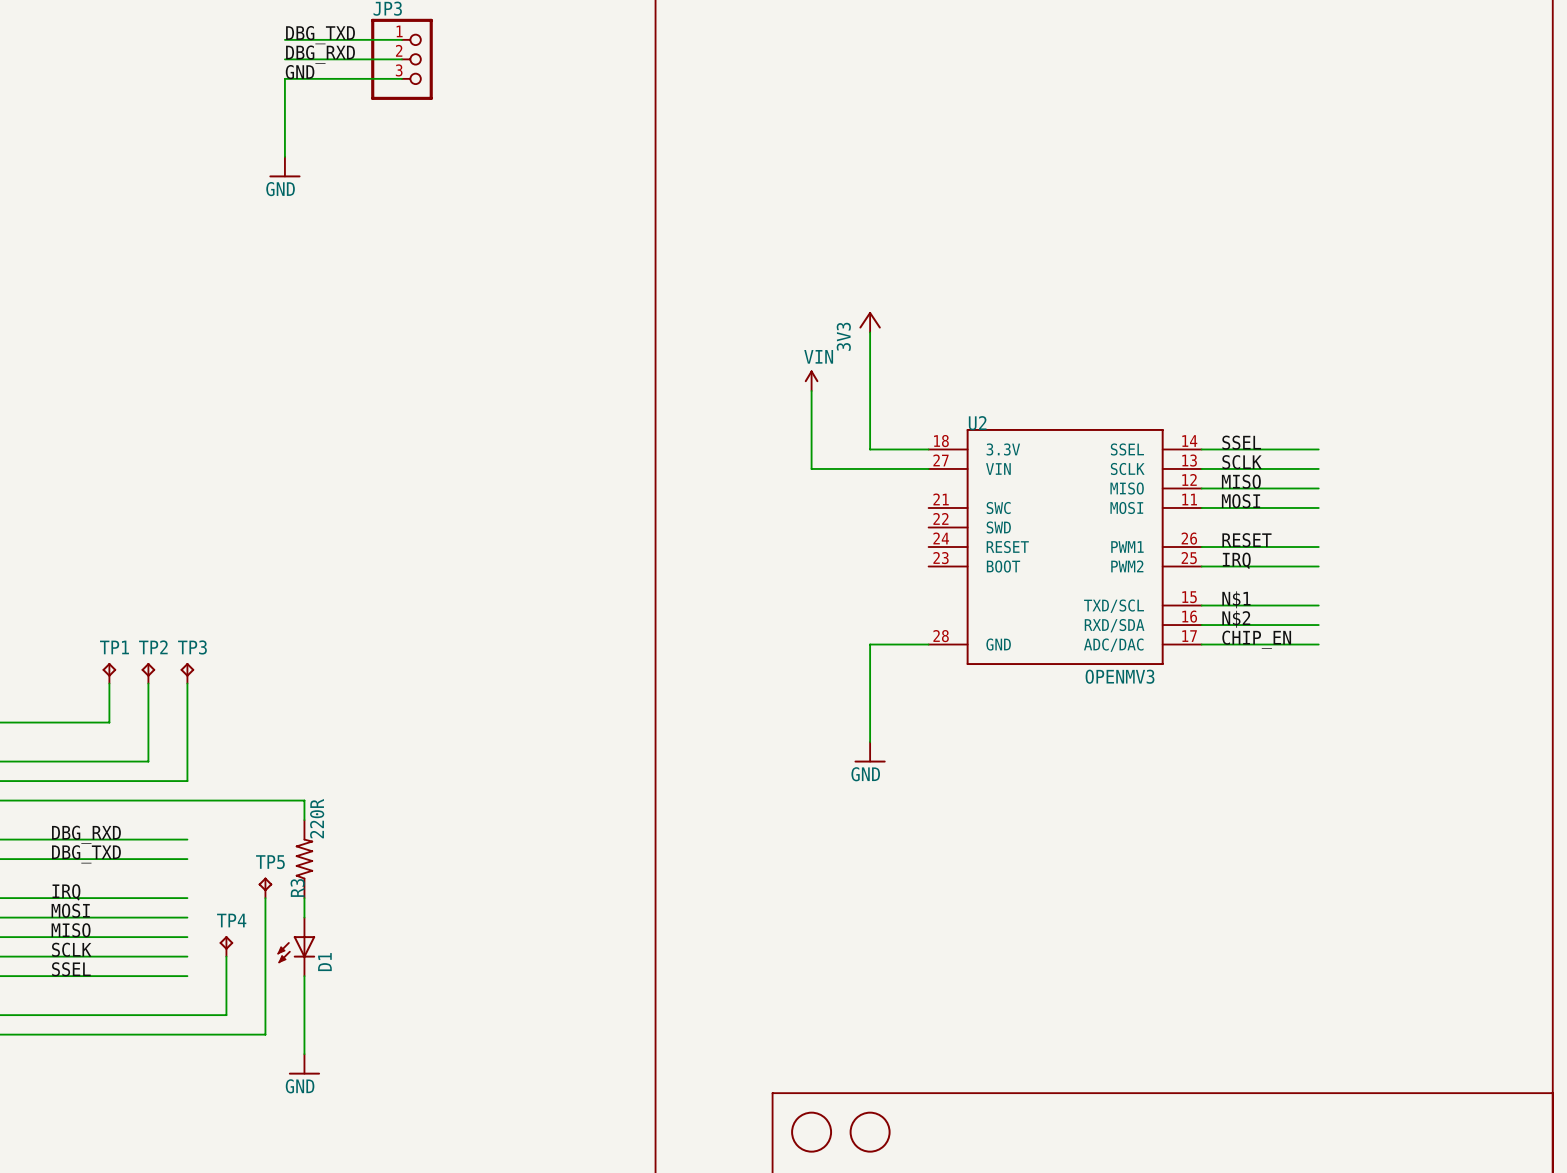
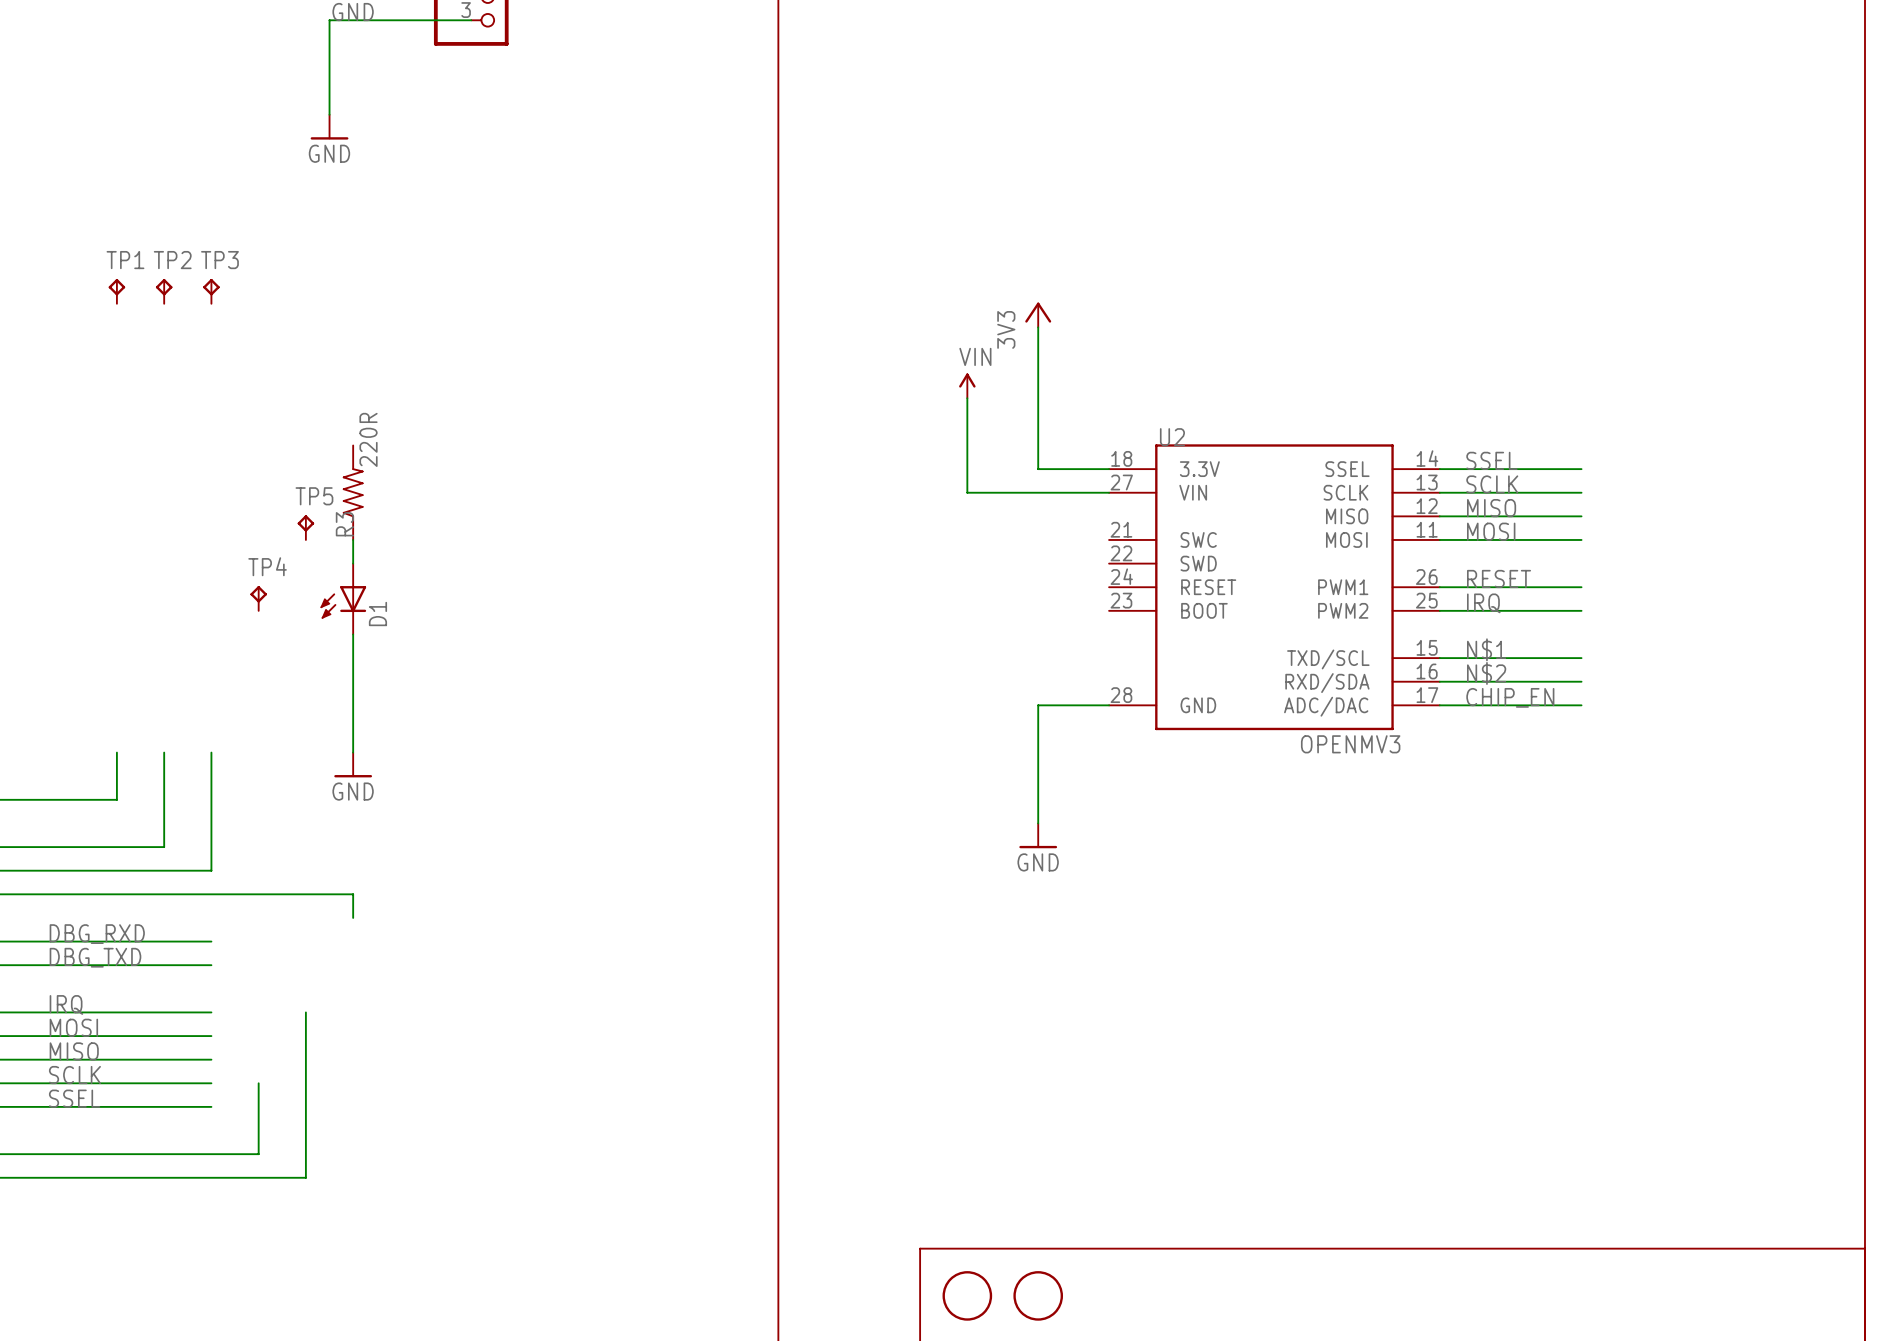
wire: none -> (353, 539) (353, 563)
wire: none -> (353, 634) (353, 752)
TP1 position: (109, 673) -> (116, 291)
TP2 position: (148, 673) -> (164, 291)
TP3 position: (187, 673) -> (211, 291)
power symbol: none -> GND (353, 764)
R3 position: (304, 859) -> (353, 492)
TP5 position: (265, 887) -> (305, 527)
wire: (304, 898) (304, 917) -> none
TP4 position: (226, 946) -> (258, 598)
D1 position: (296, 946) -> (343, 599)
wire: (304, 976) (304, 1054) -> none
power symbol: GND (304, 1064) -> none

